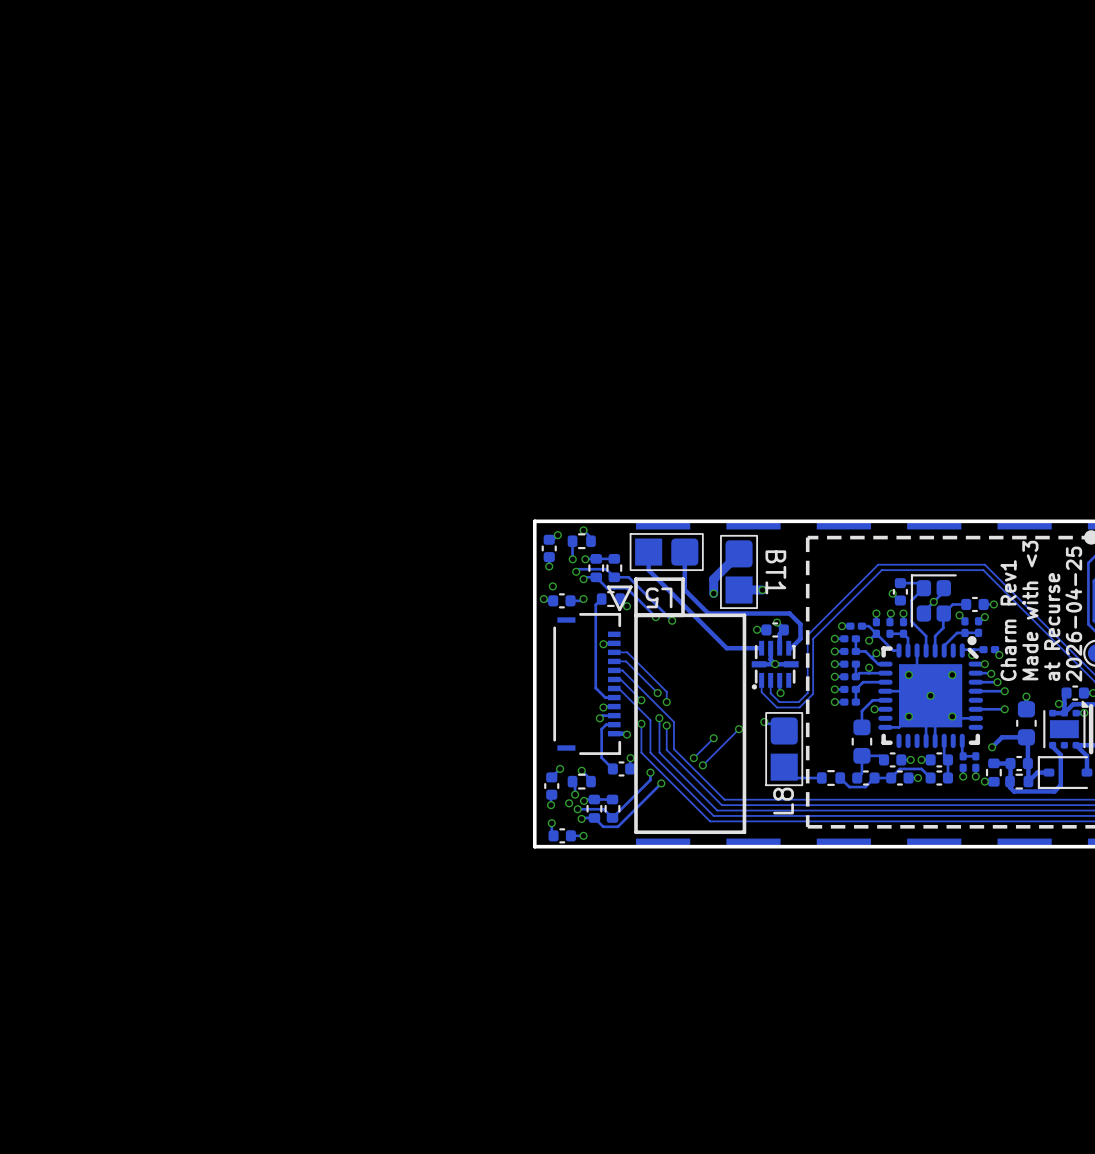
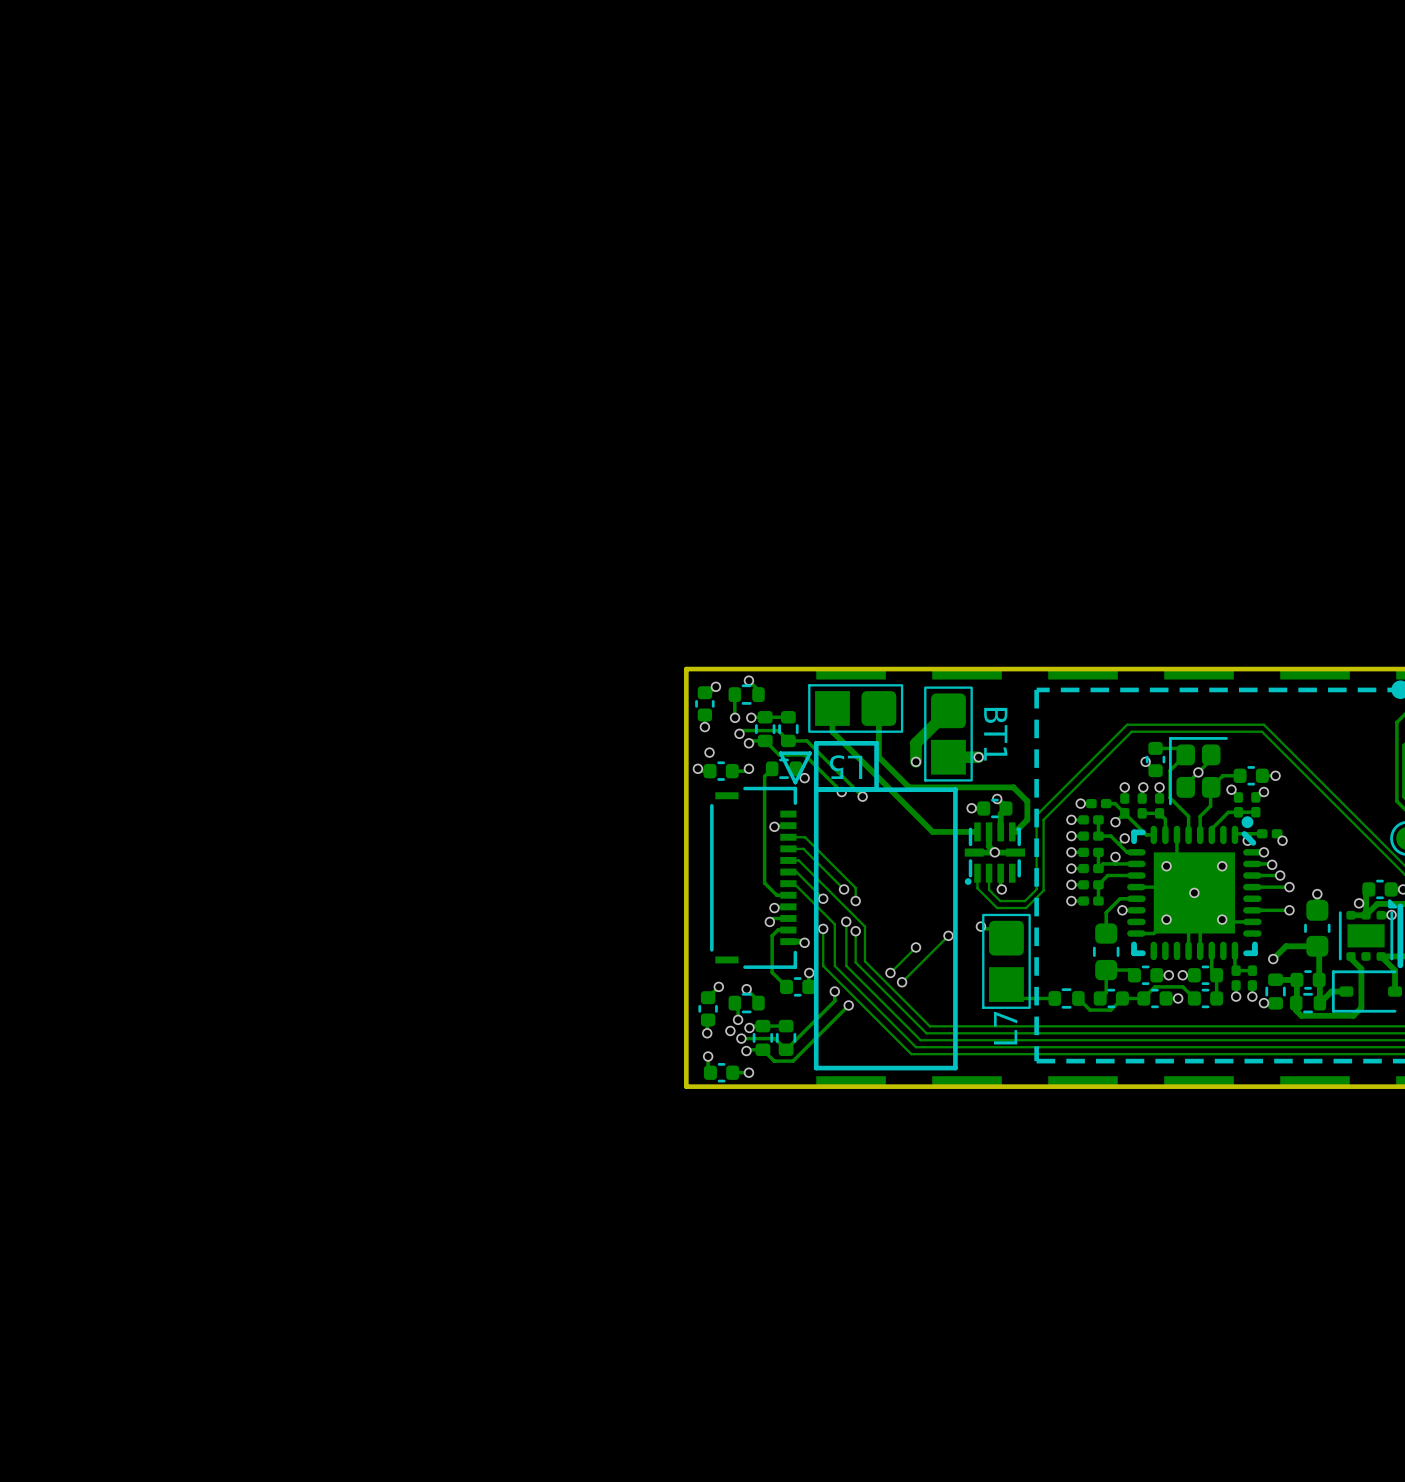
text: Made with <3 (1030, 610) -> none
text: 2026-04-25 (1073, 614) -> none
text: Charm Rev1 (1008, 620) -> none
text: at Recurse (1052, 627) -> none
L8 name: L8 (783, 801) -> L7 (1005, 1028)

